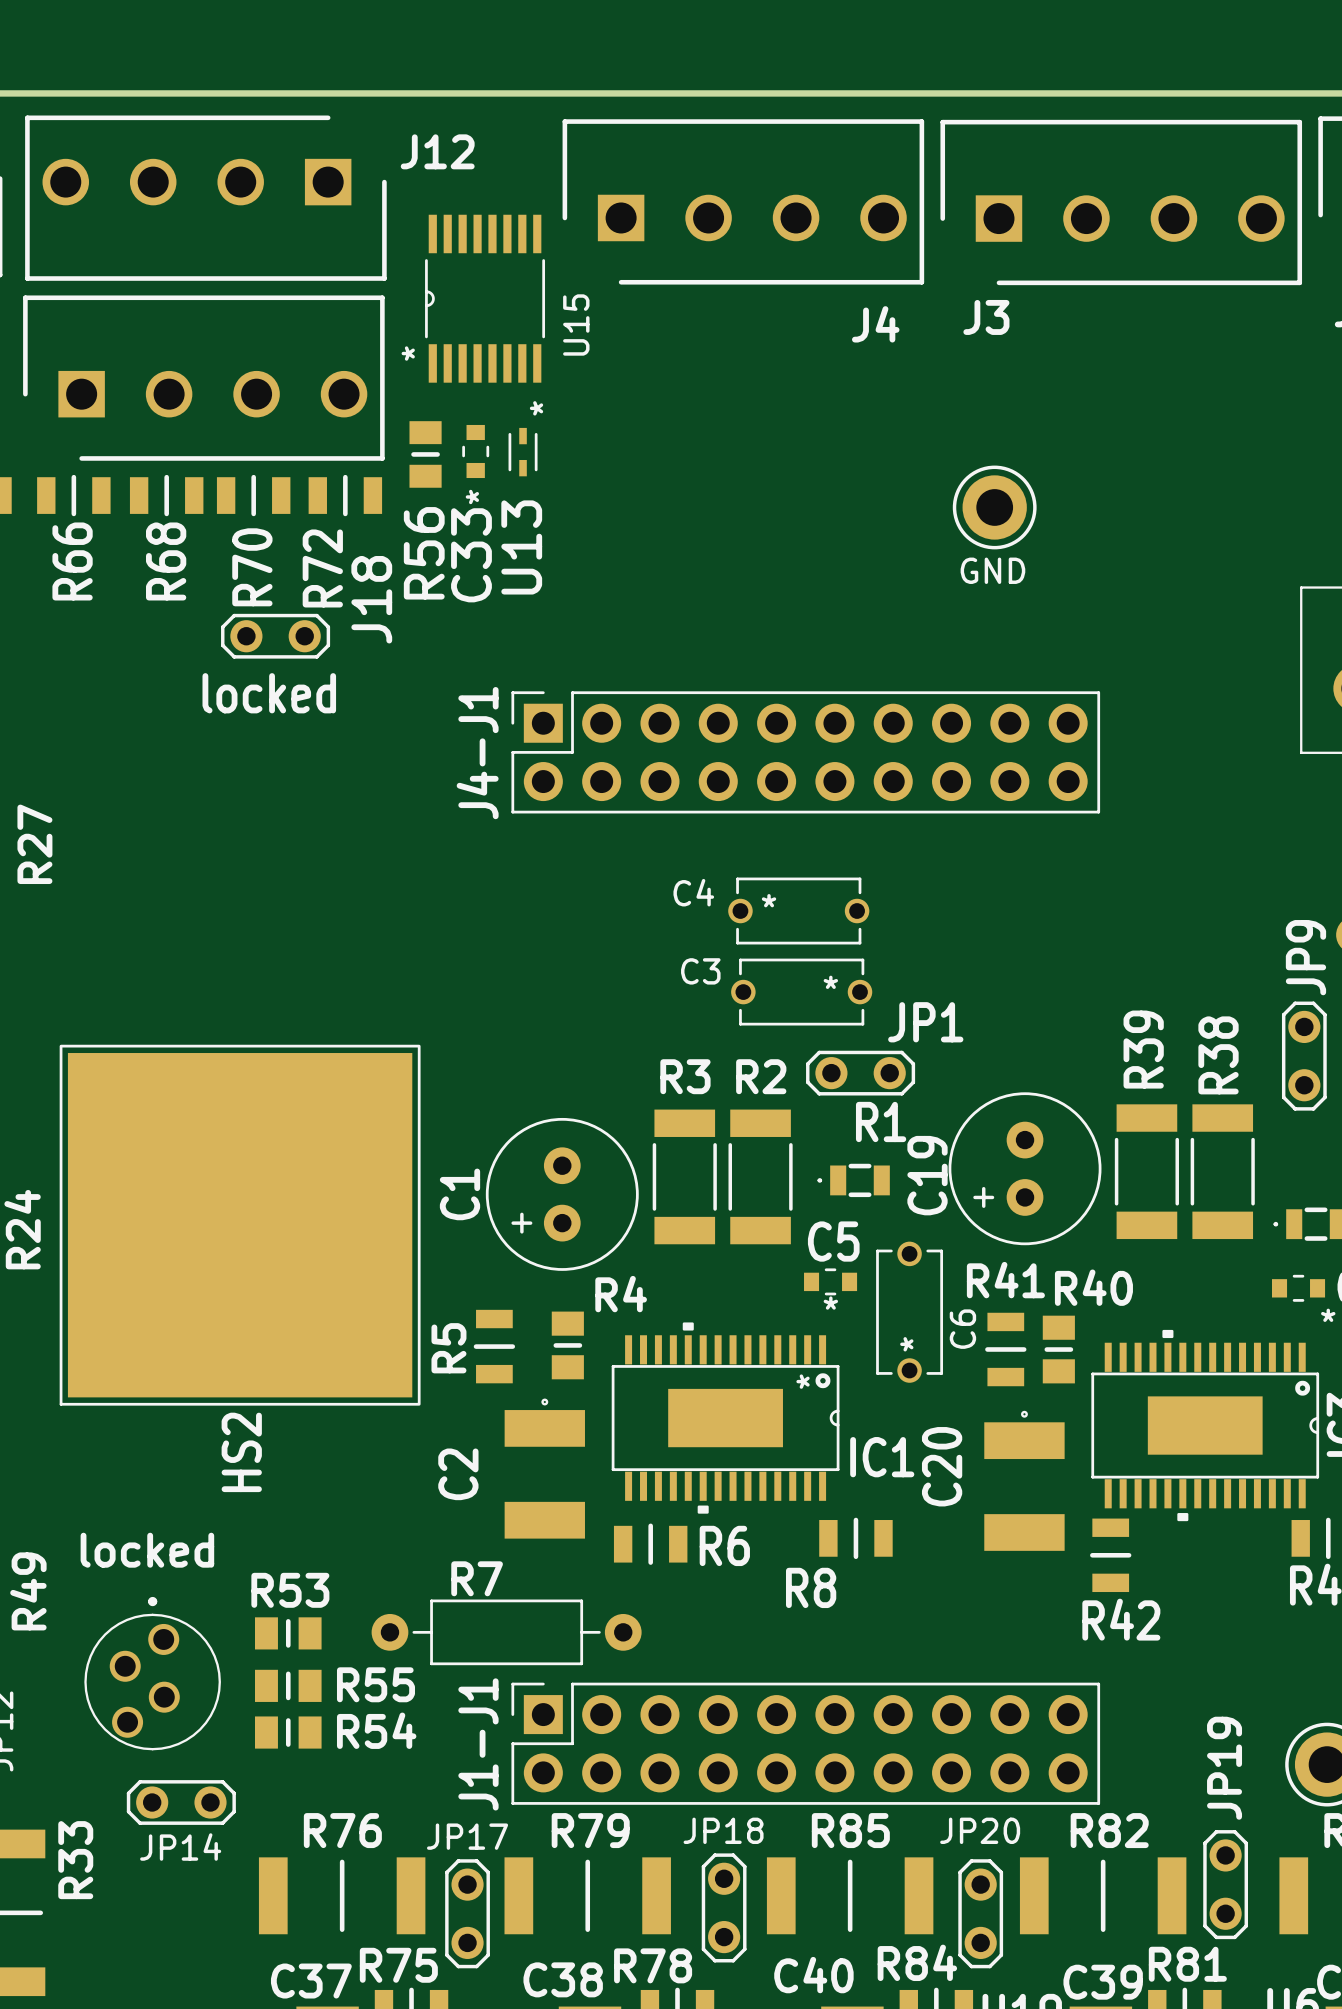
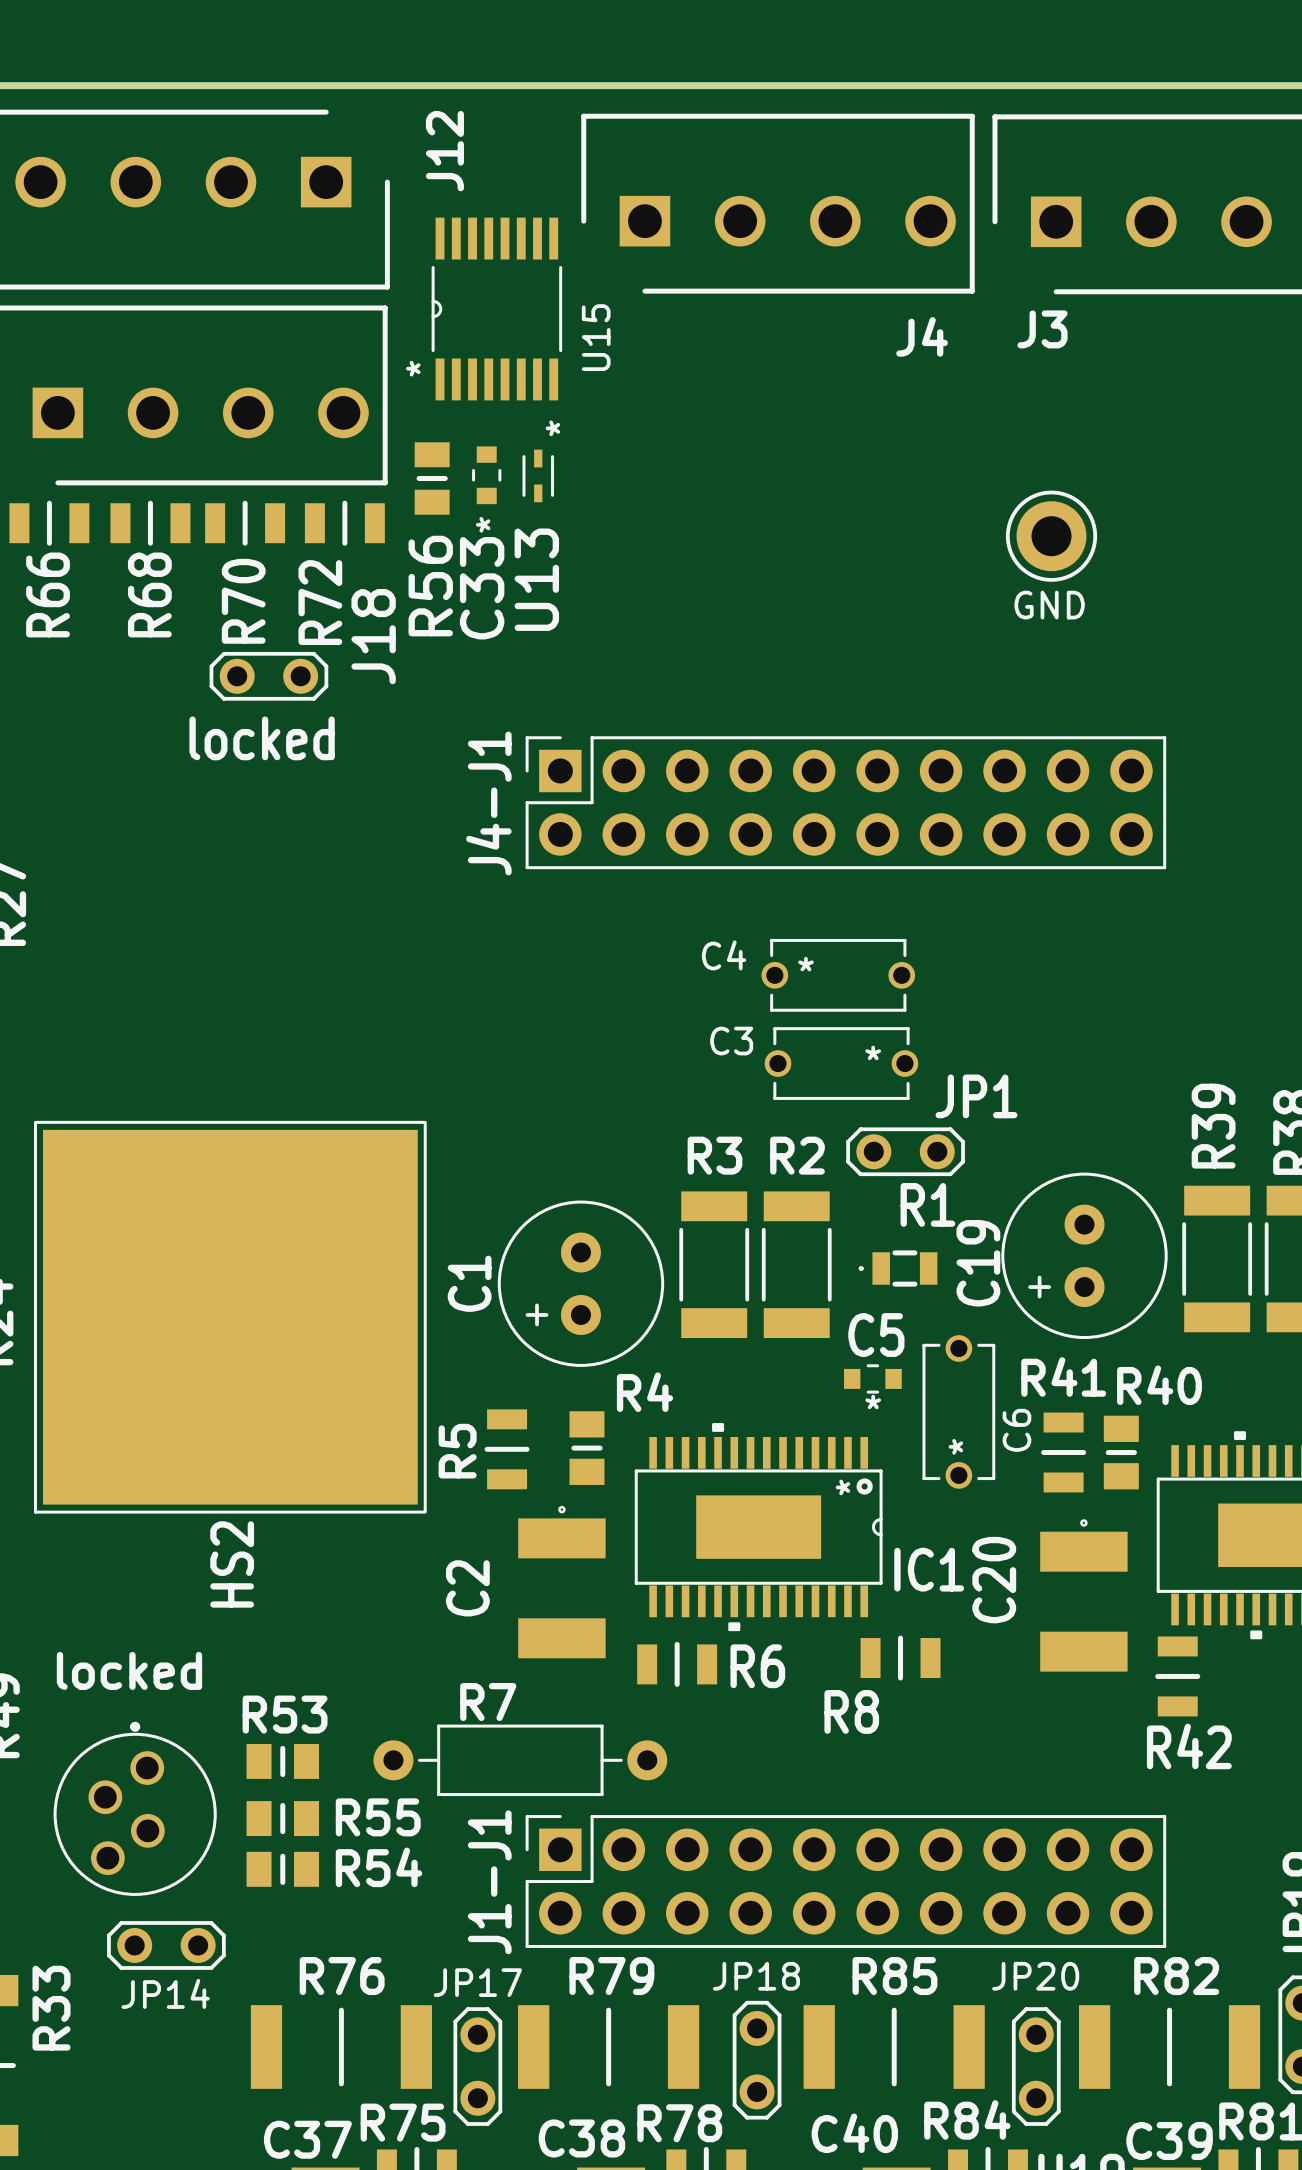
J12 name rotation: 0° (437, 151) -> 90° counterclockwise (444, 151)
locked footprint: [84, 1596, 221, 1751] -> [53, 1721, 217, 1896]

